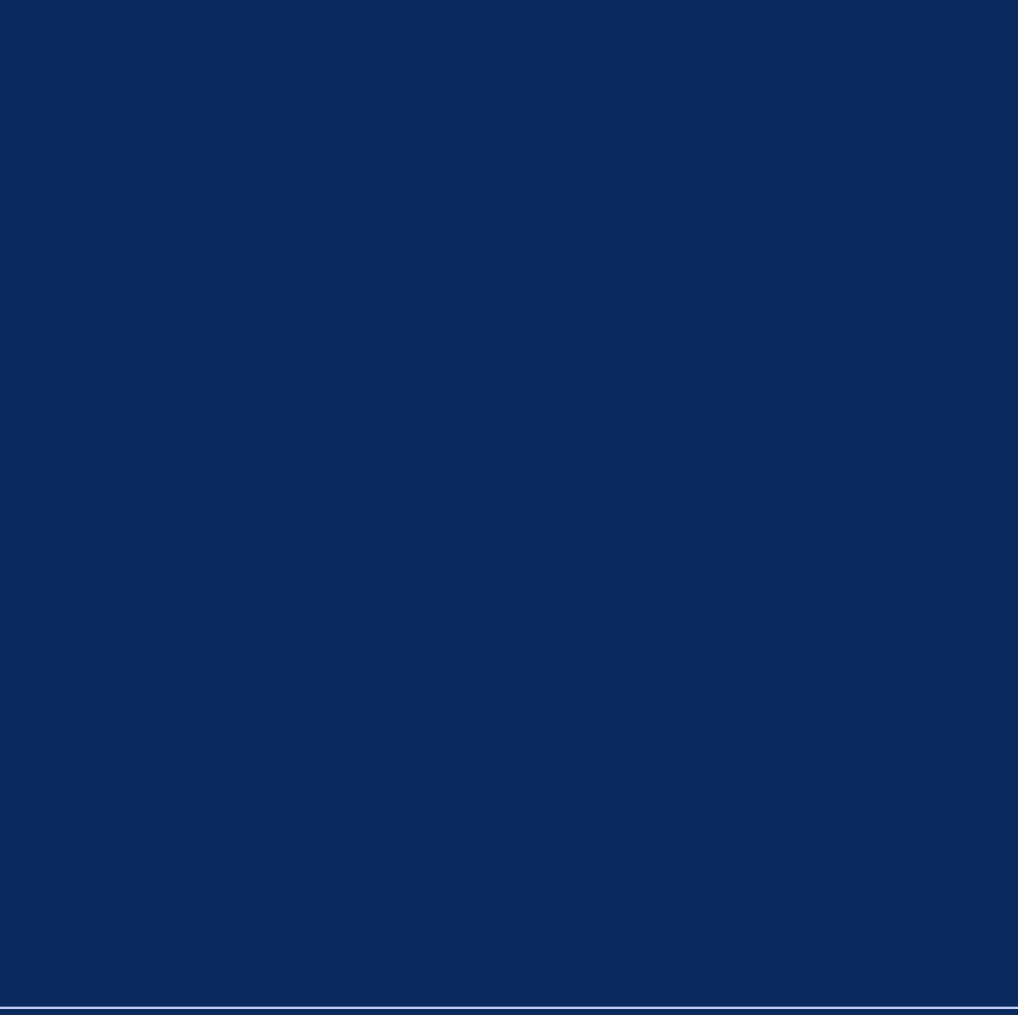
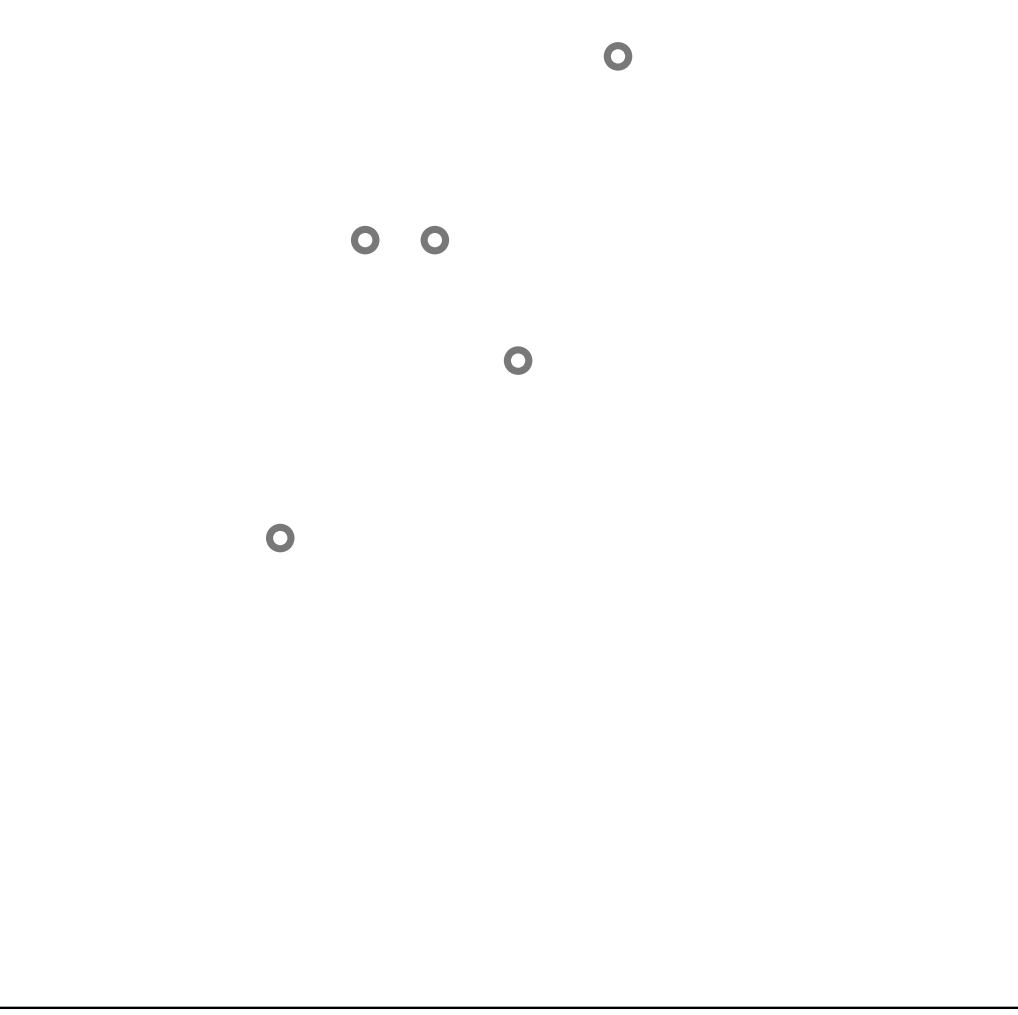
via: none -> (618, 56)
via: none -> (365, 240)
via: none -> (434, 240)
via: none -> (518, 360)
via: none -> (280, 538)

